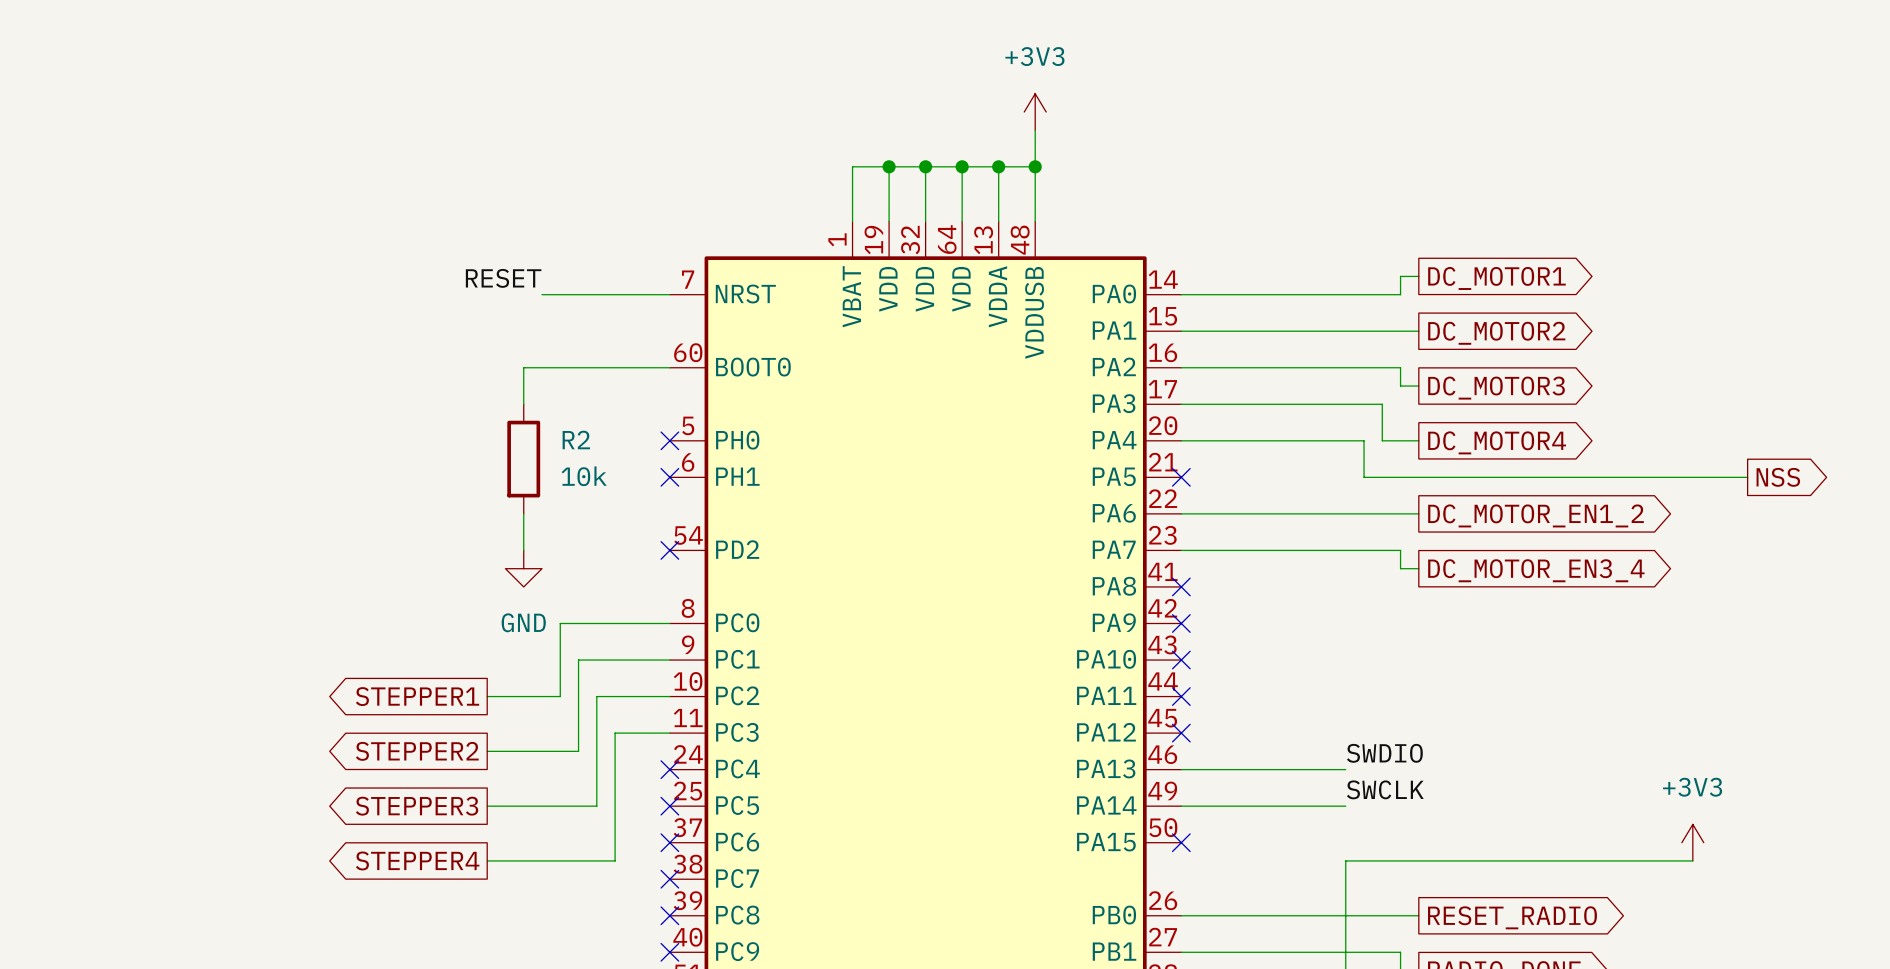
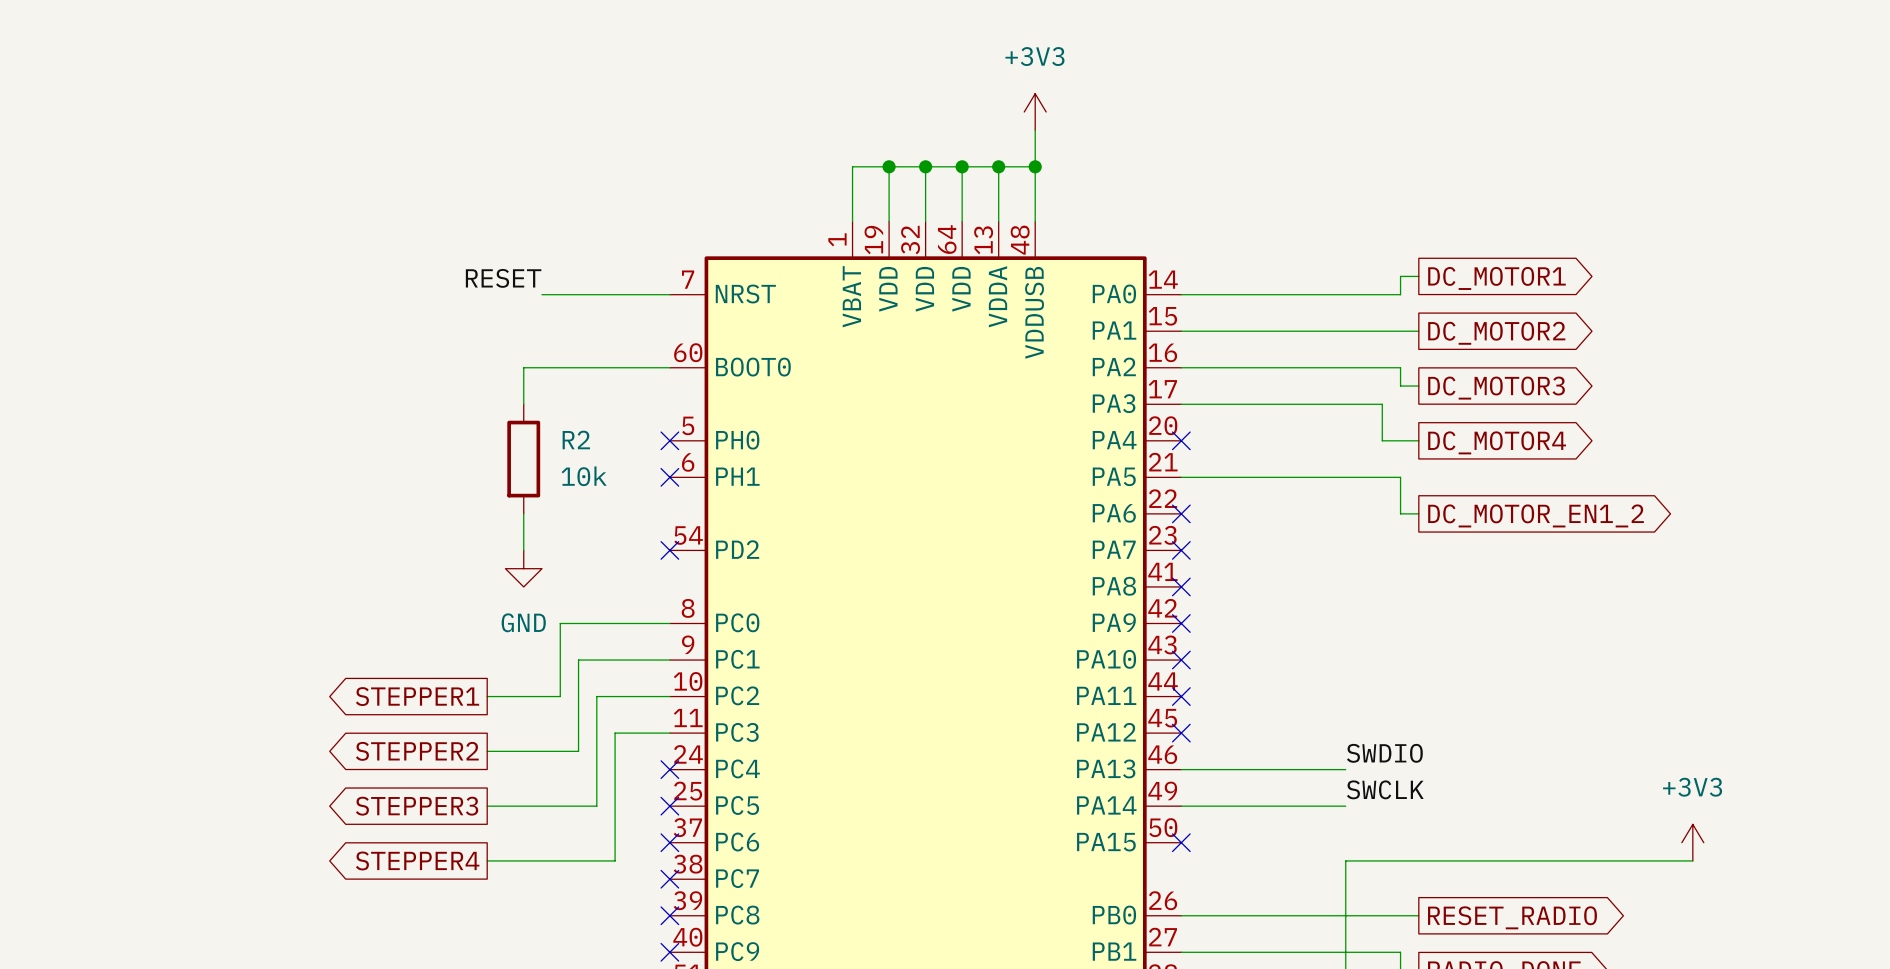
wire: (1181, 440) (1364, 440) (1364, 477) -> (1181, 477) (1364, 477)
no-connect mark: none -> (1181, 440)
no-connect mark: (1181, 477) -> none
wire: (1400, 477) (1747, 477) -> none
global label: NSS (1778, 477) -> none
wire: (1181, 513) (1400, 513) -> (1400, 477) (1400, 513)
no-connect mark: none -> (1181, 513)
wire: (1181, 550) (1400, 550) (1400, 568) (1418, 568) -> none
no-connect mark: none -> (1181, 550)
global label: DC_MOTOR_EN3_4 (1536, 570) -> none

